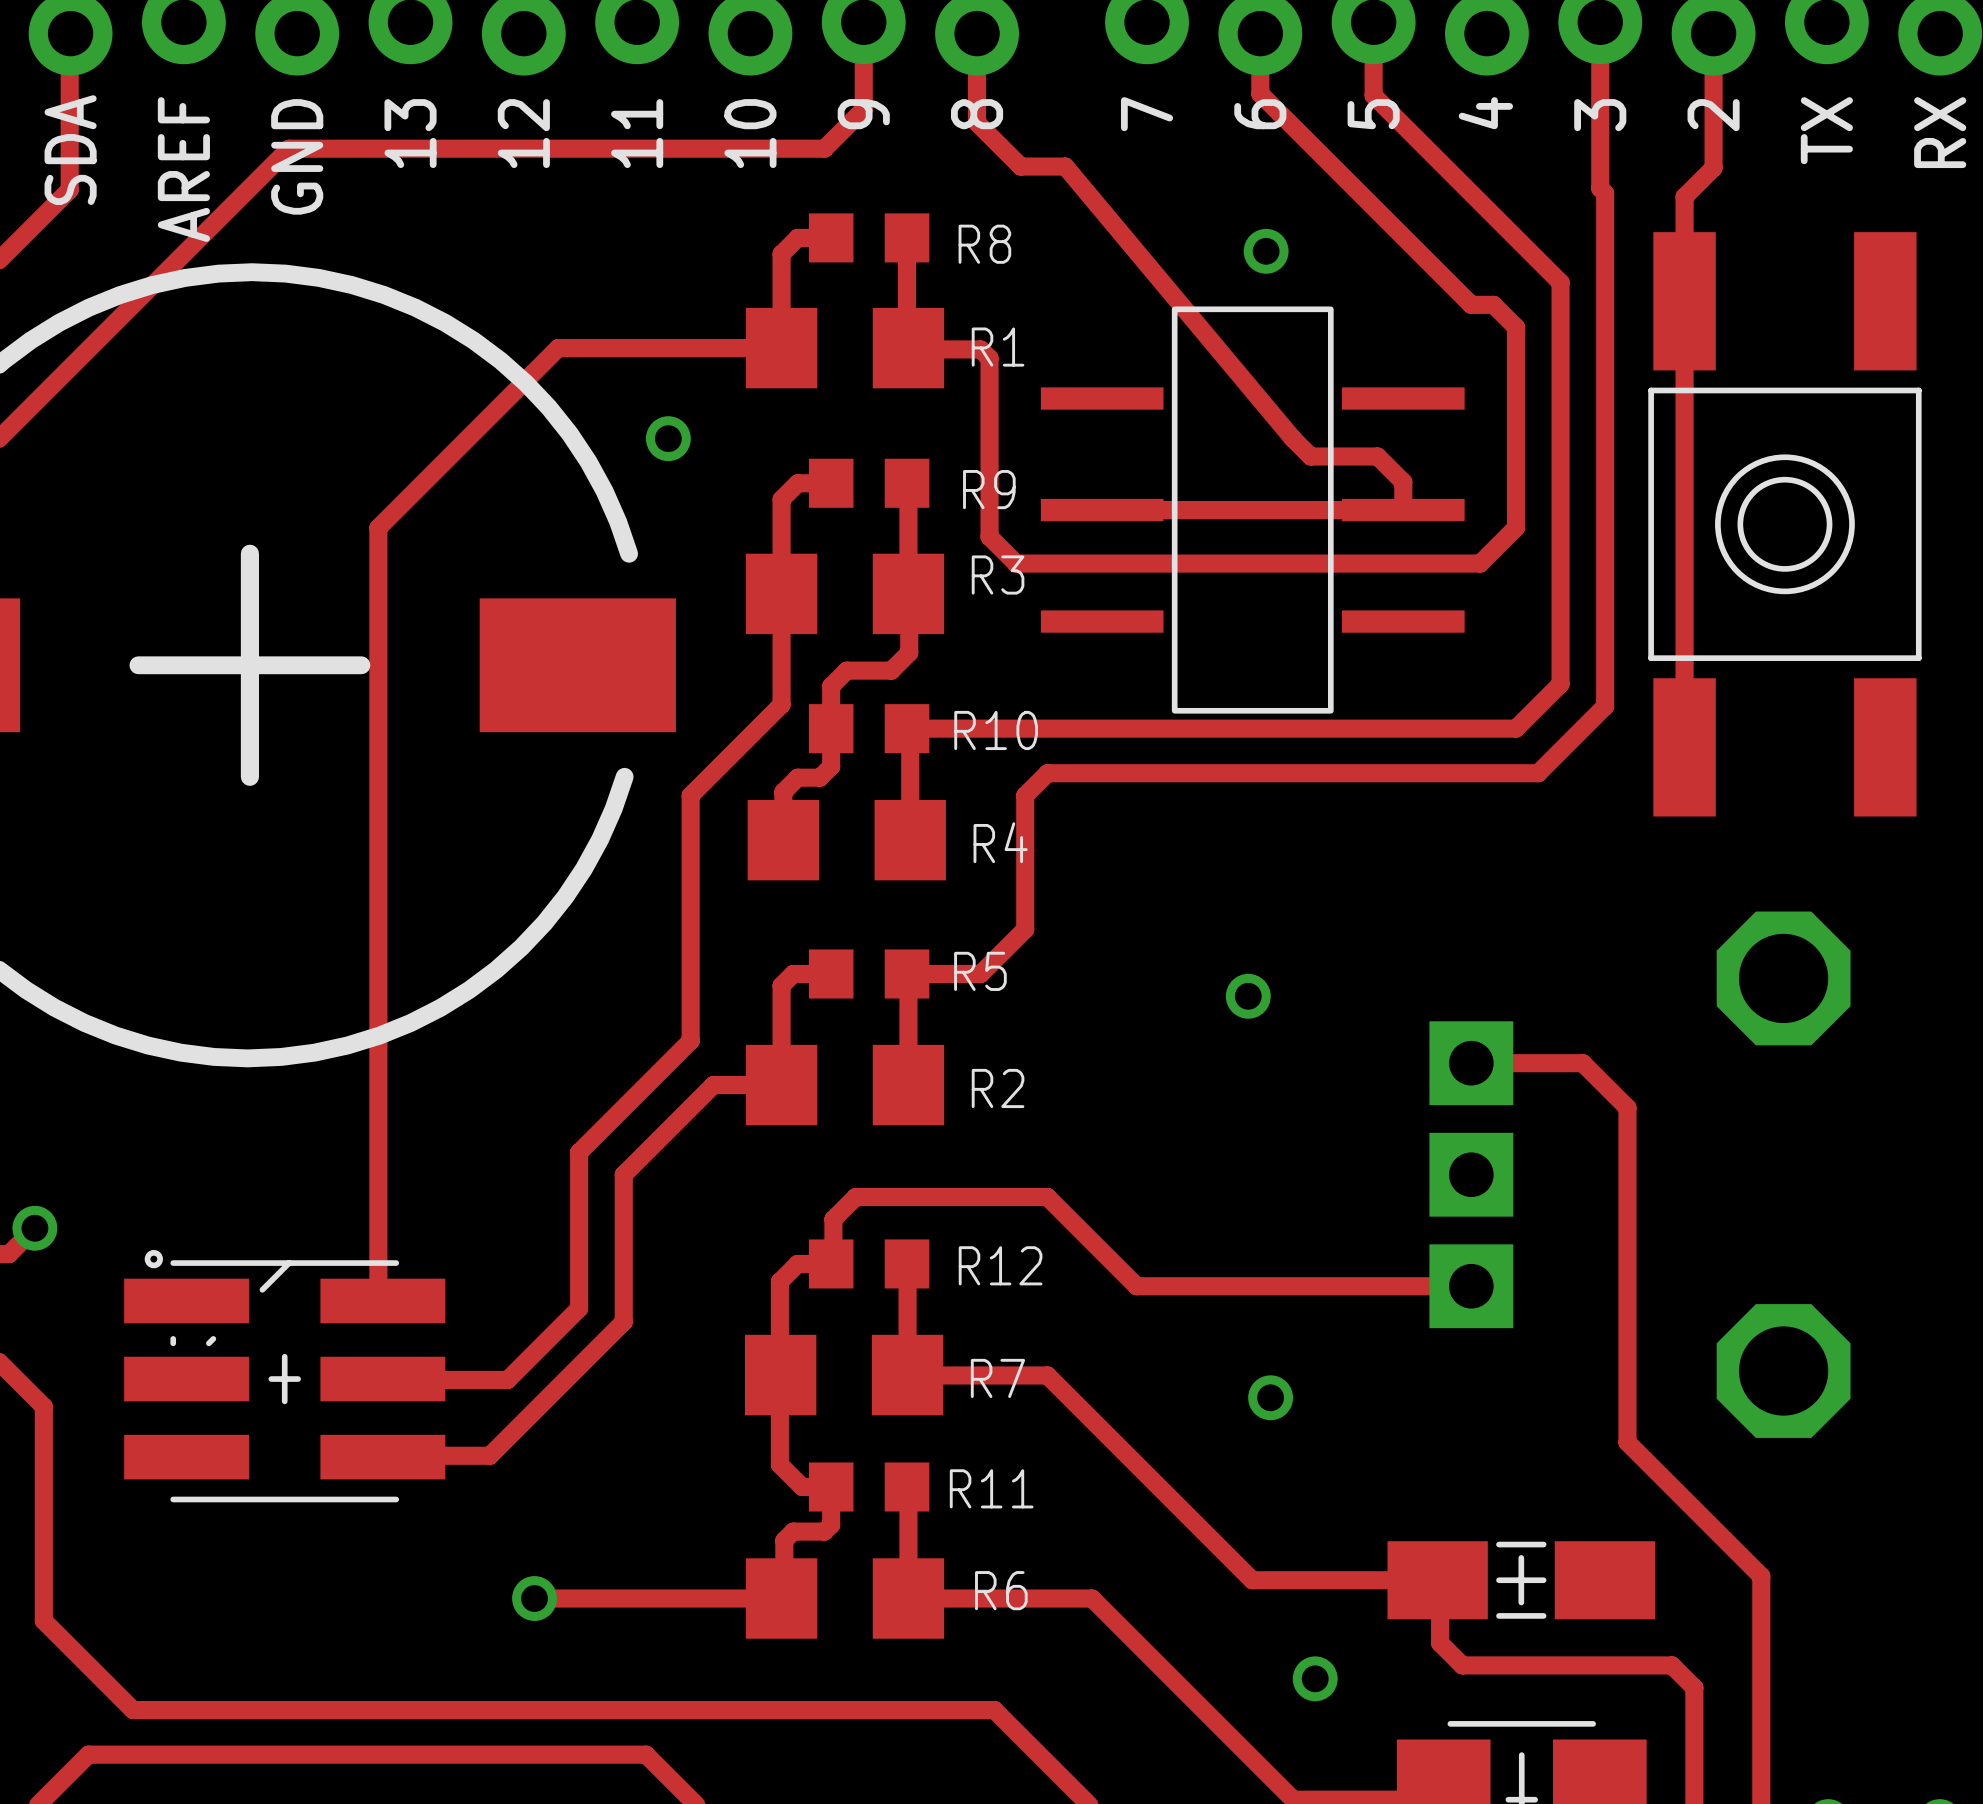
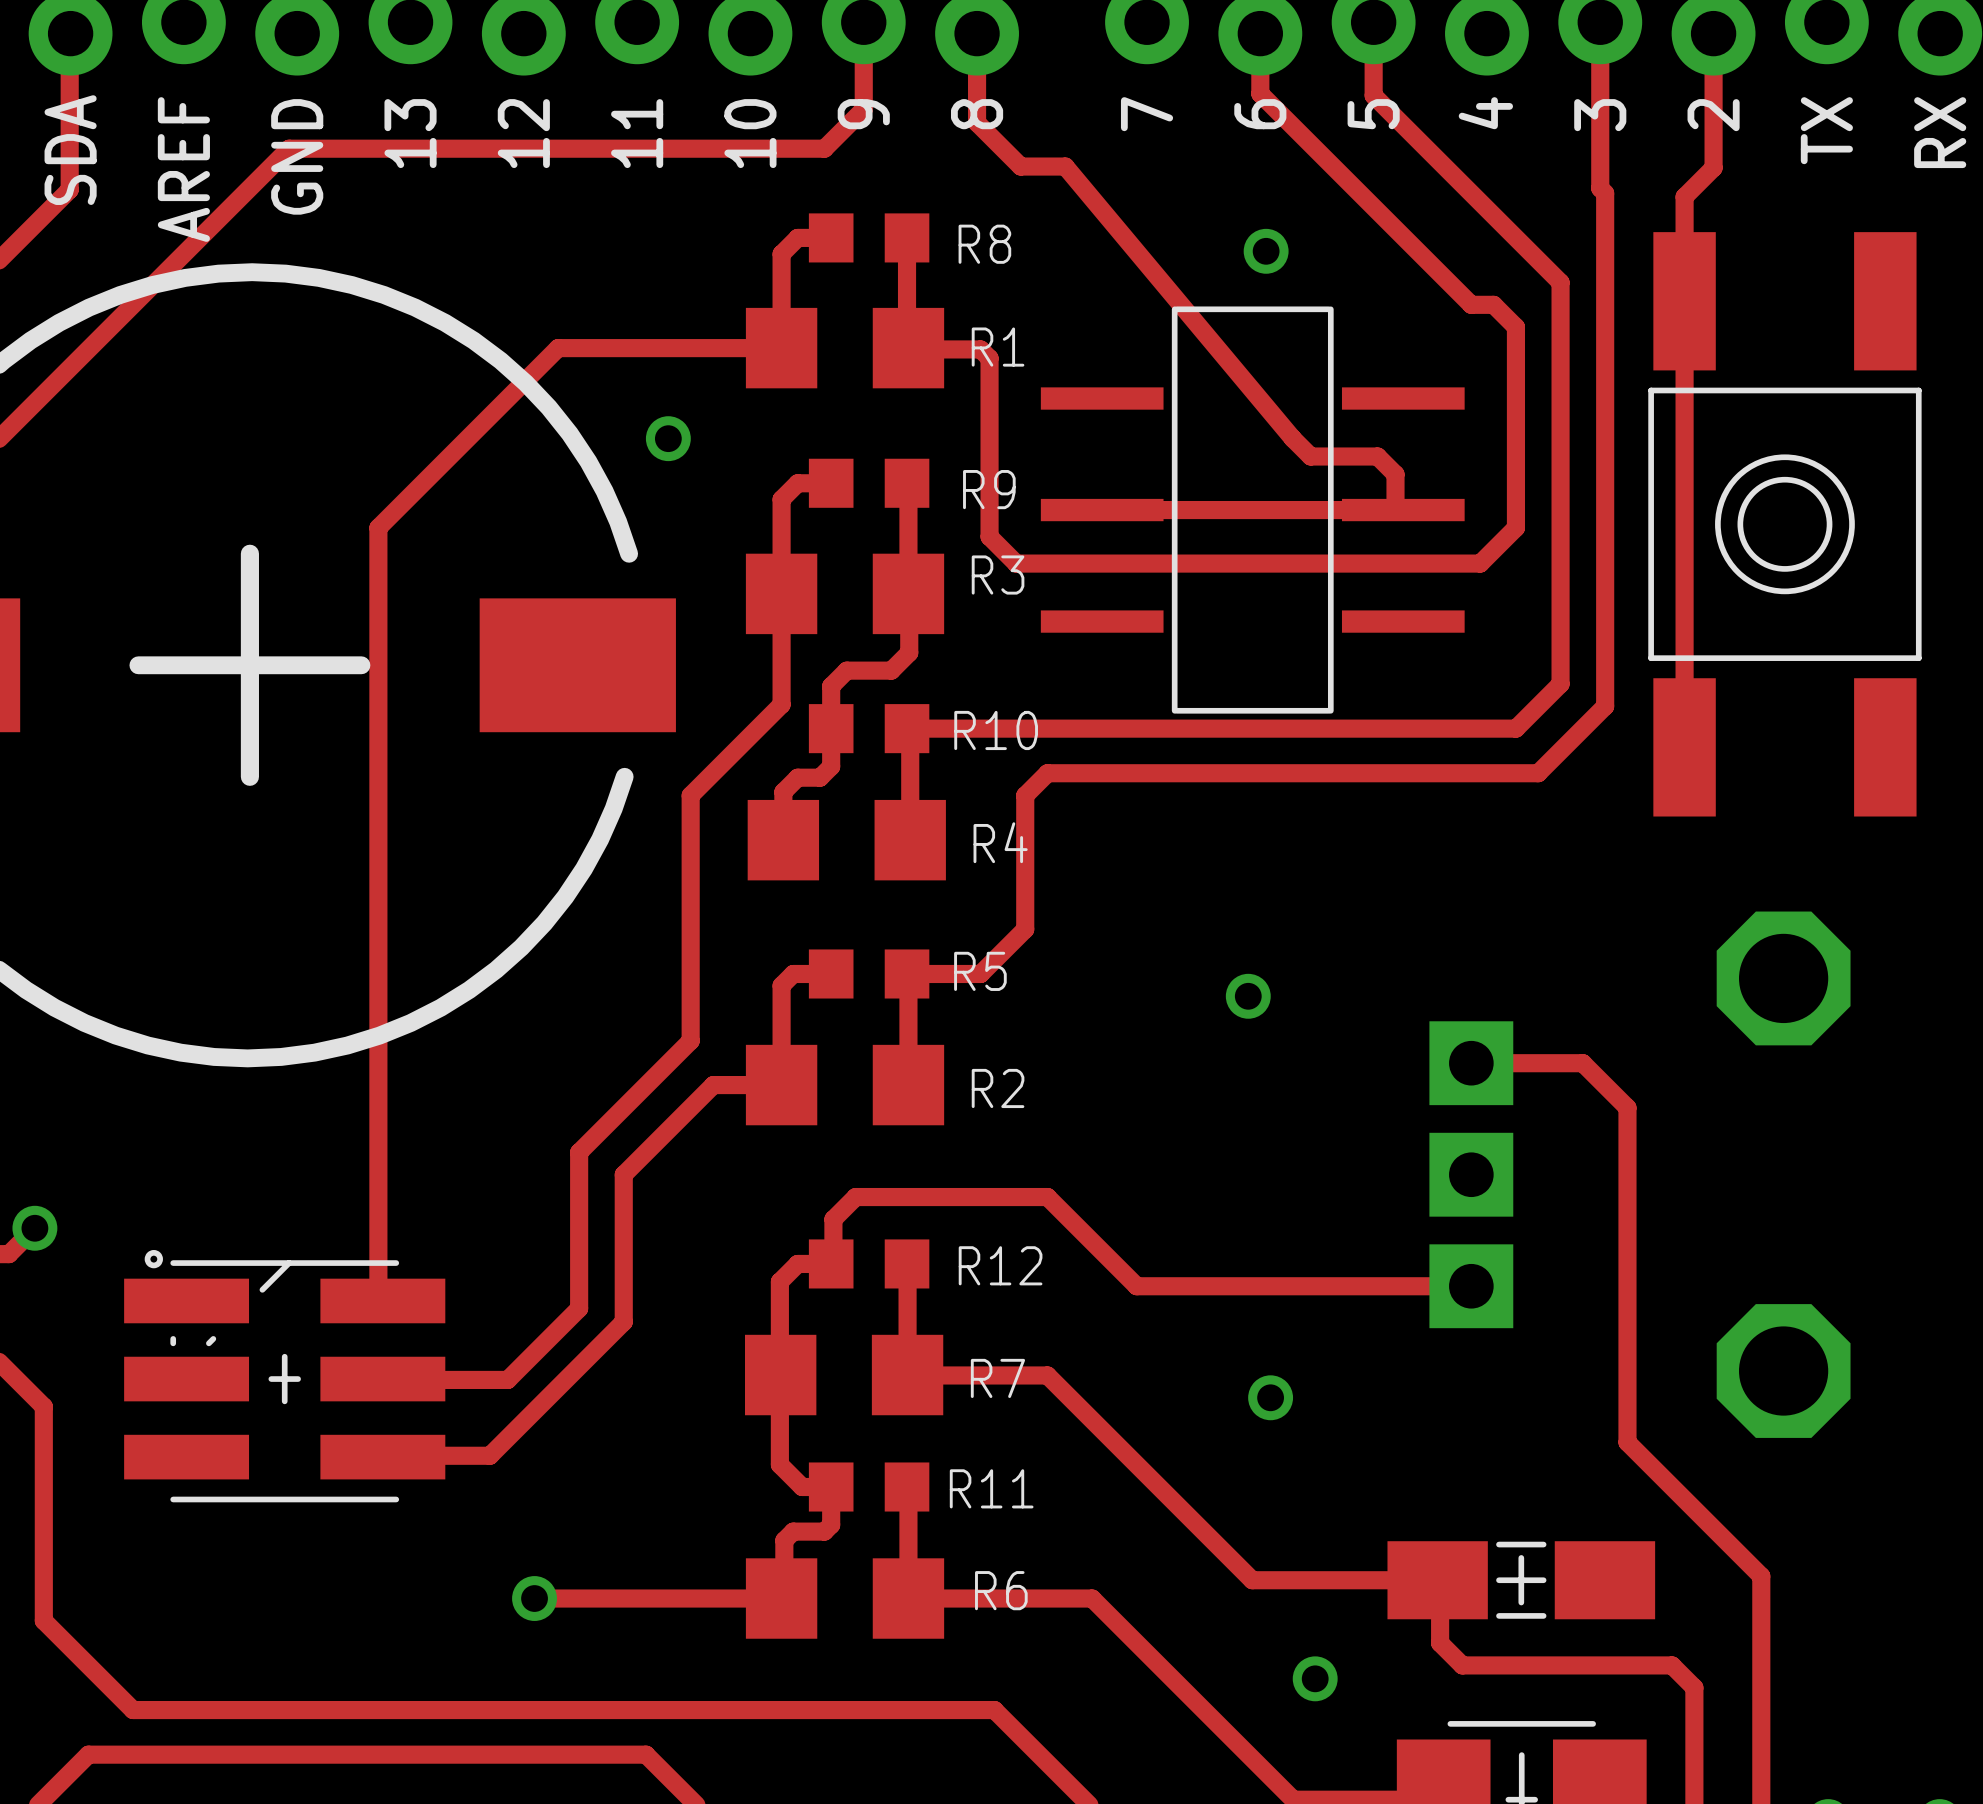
track: (1395, 474) (1403, 482) (1403, 510) -> (1395, 474) (1395, 500)

